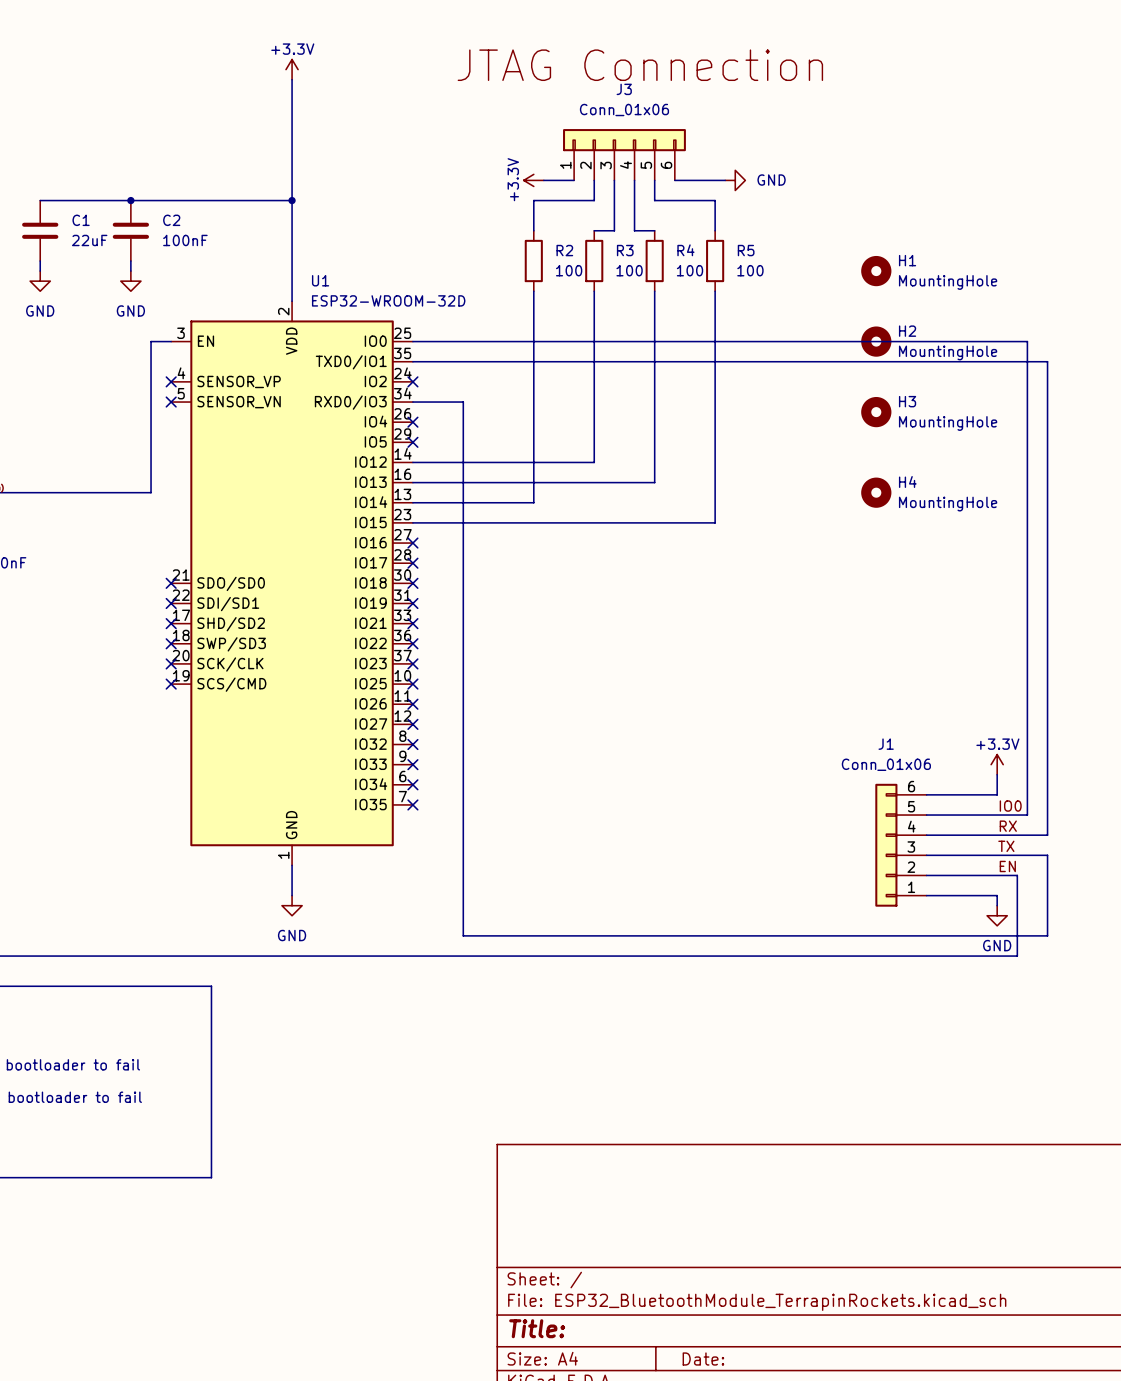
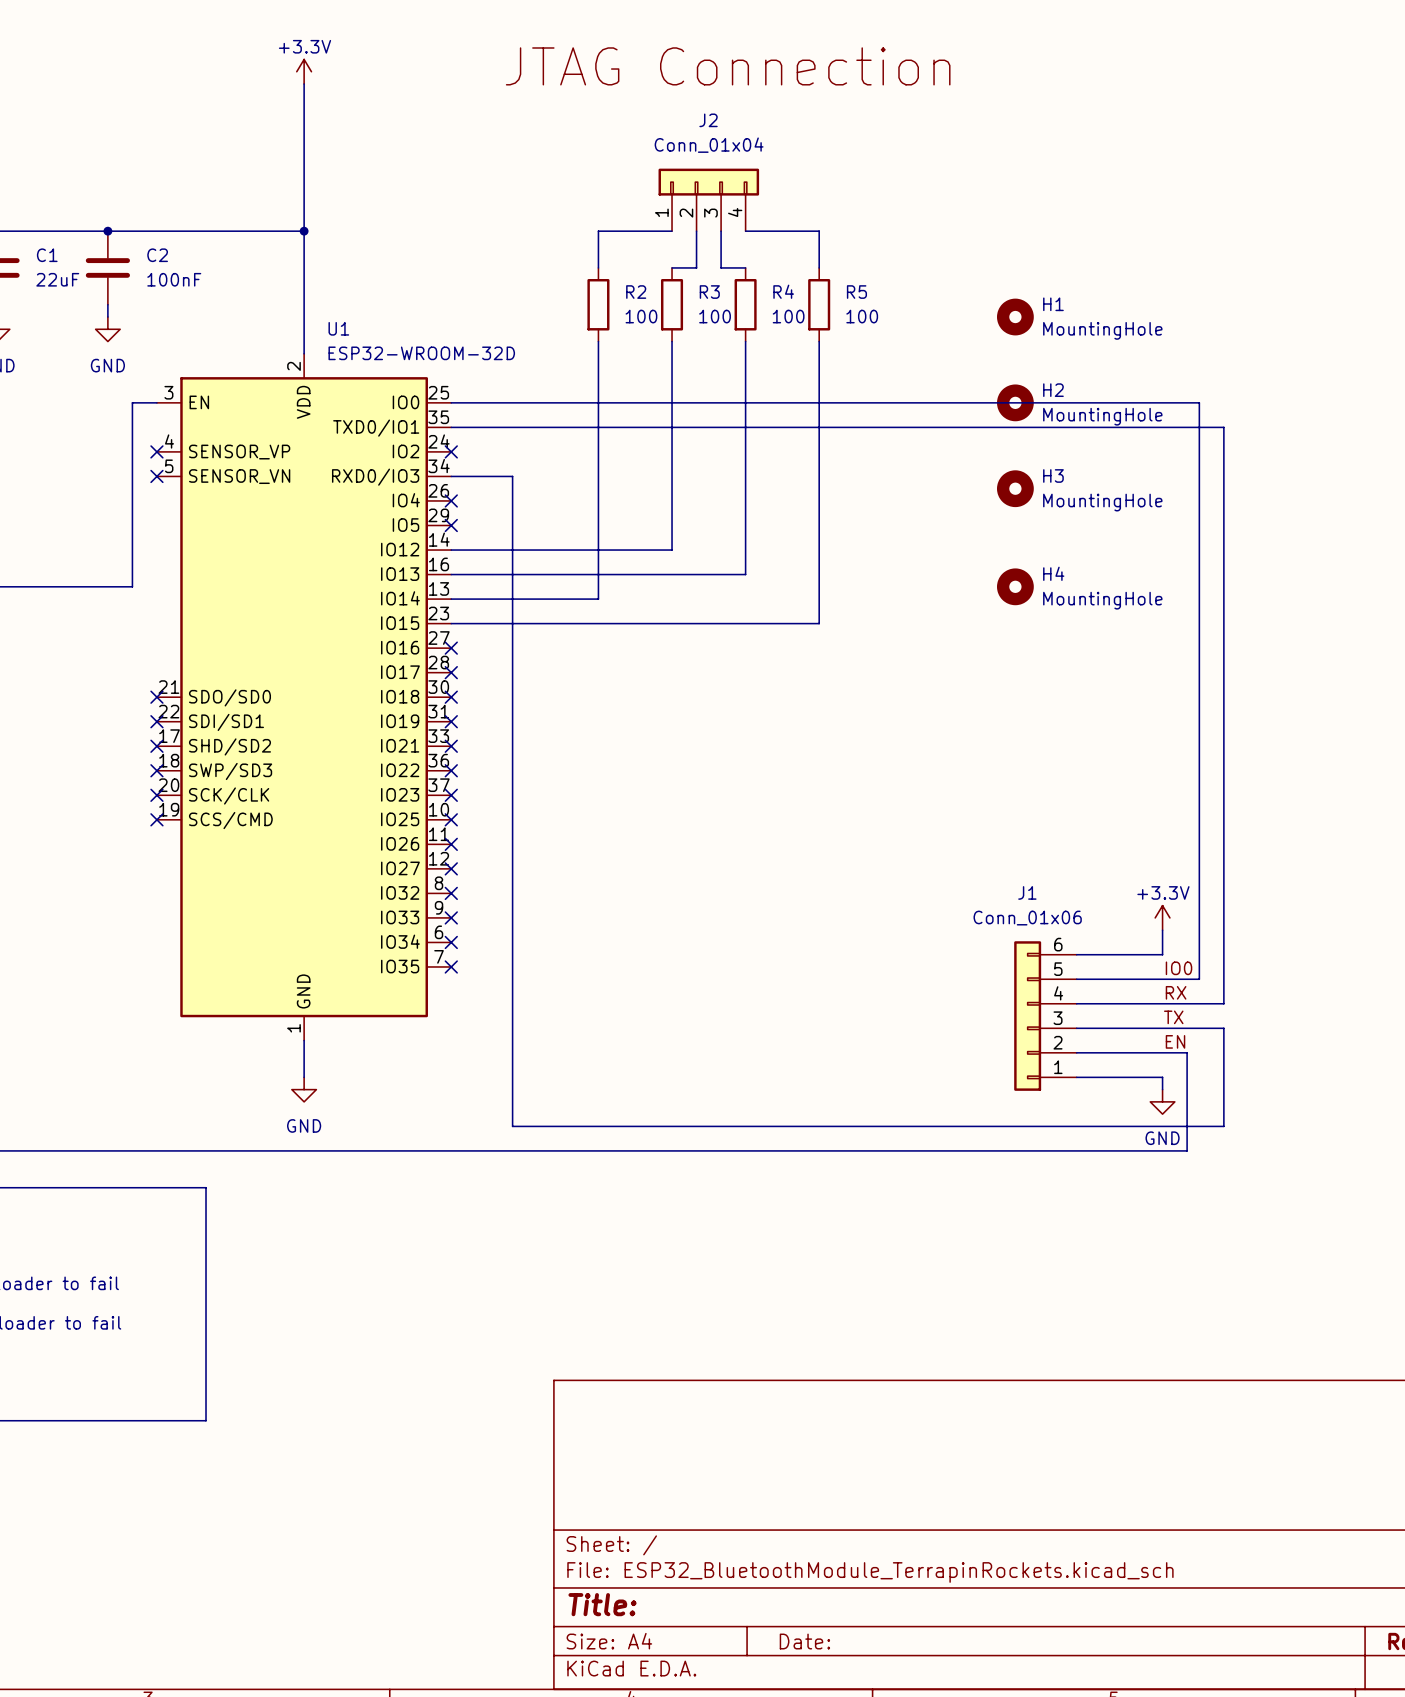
J3: Conn_01x06 (624, 154) -> none
J2: none -> Conn_01x04 (708, 199)
power symbol: +3.3V (533, 180) -> none
wire: (543, 180) (574, 180) -> none
wire: (674, 180) (725, 180) -> none
power symbol: GND (735, 180) -> none

